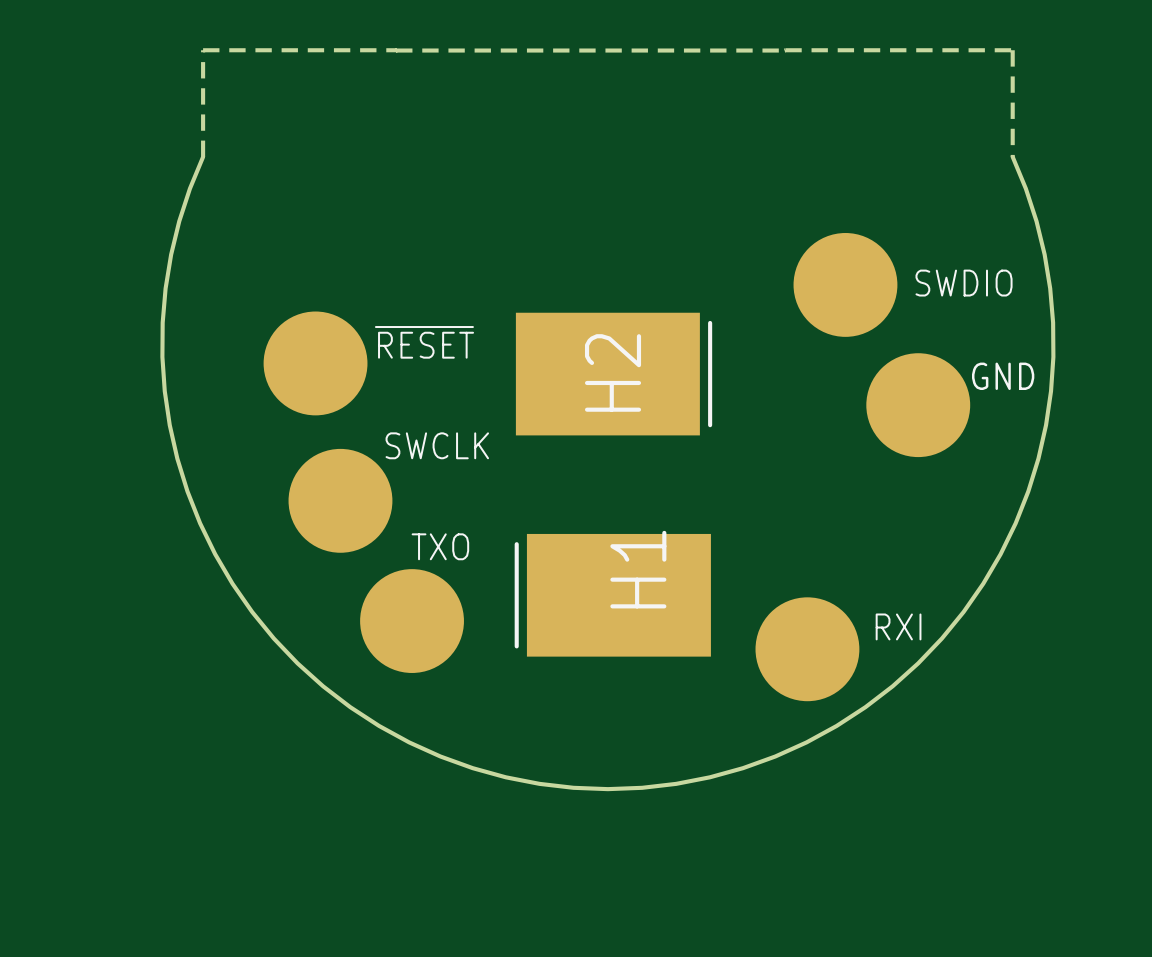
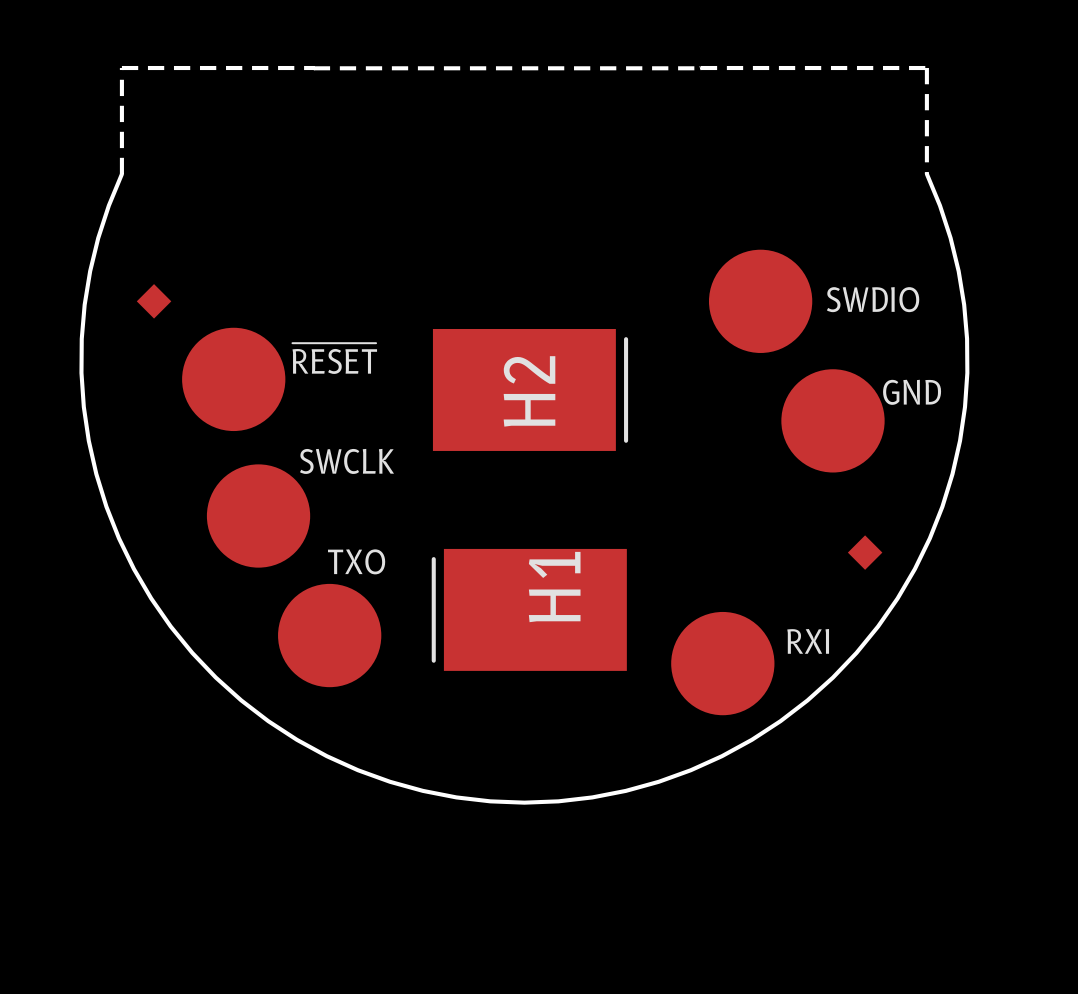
part: none -> (154, 301)
part: none -> (865, 552)

